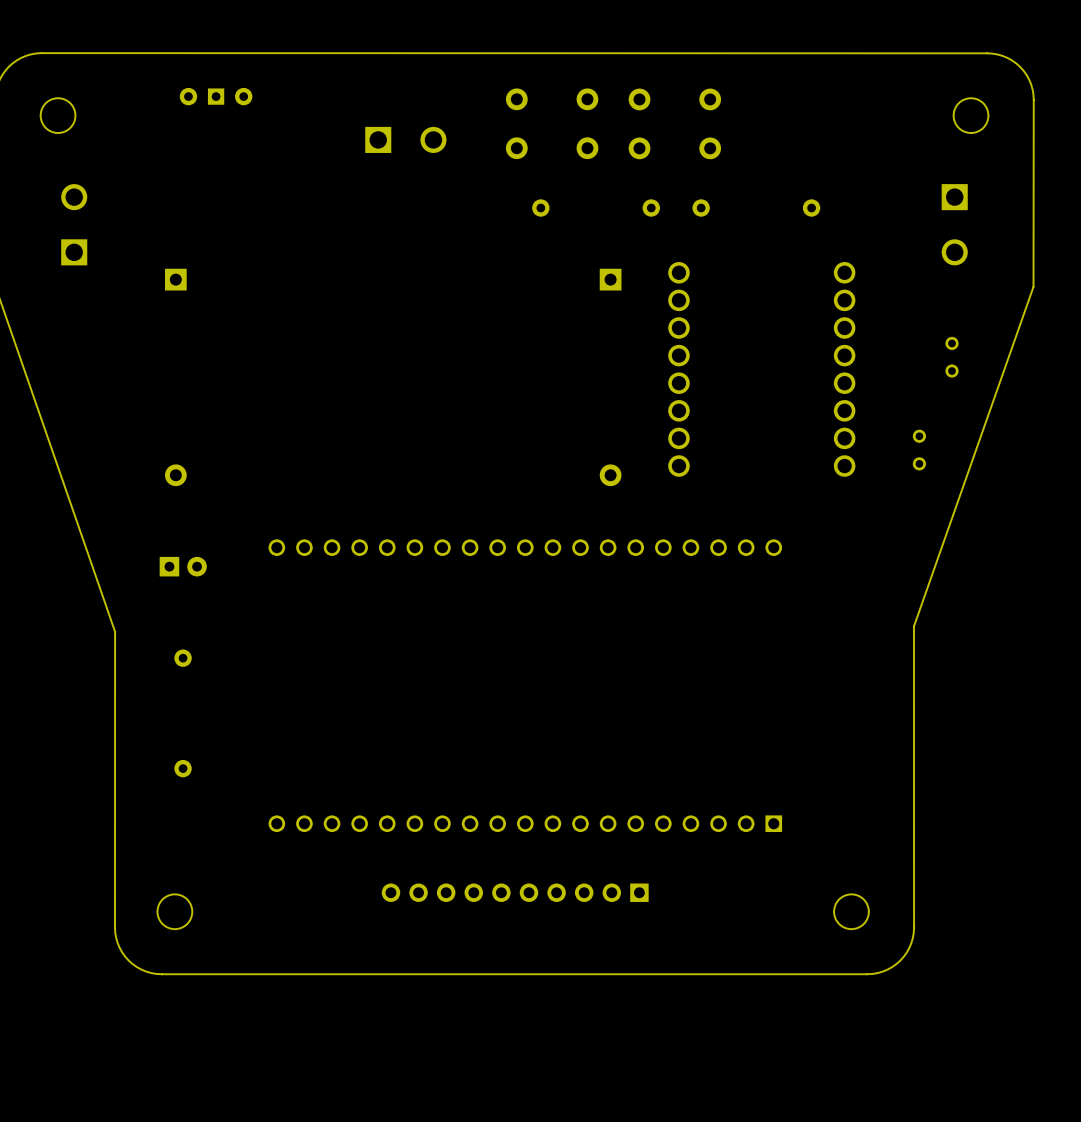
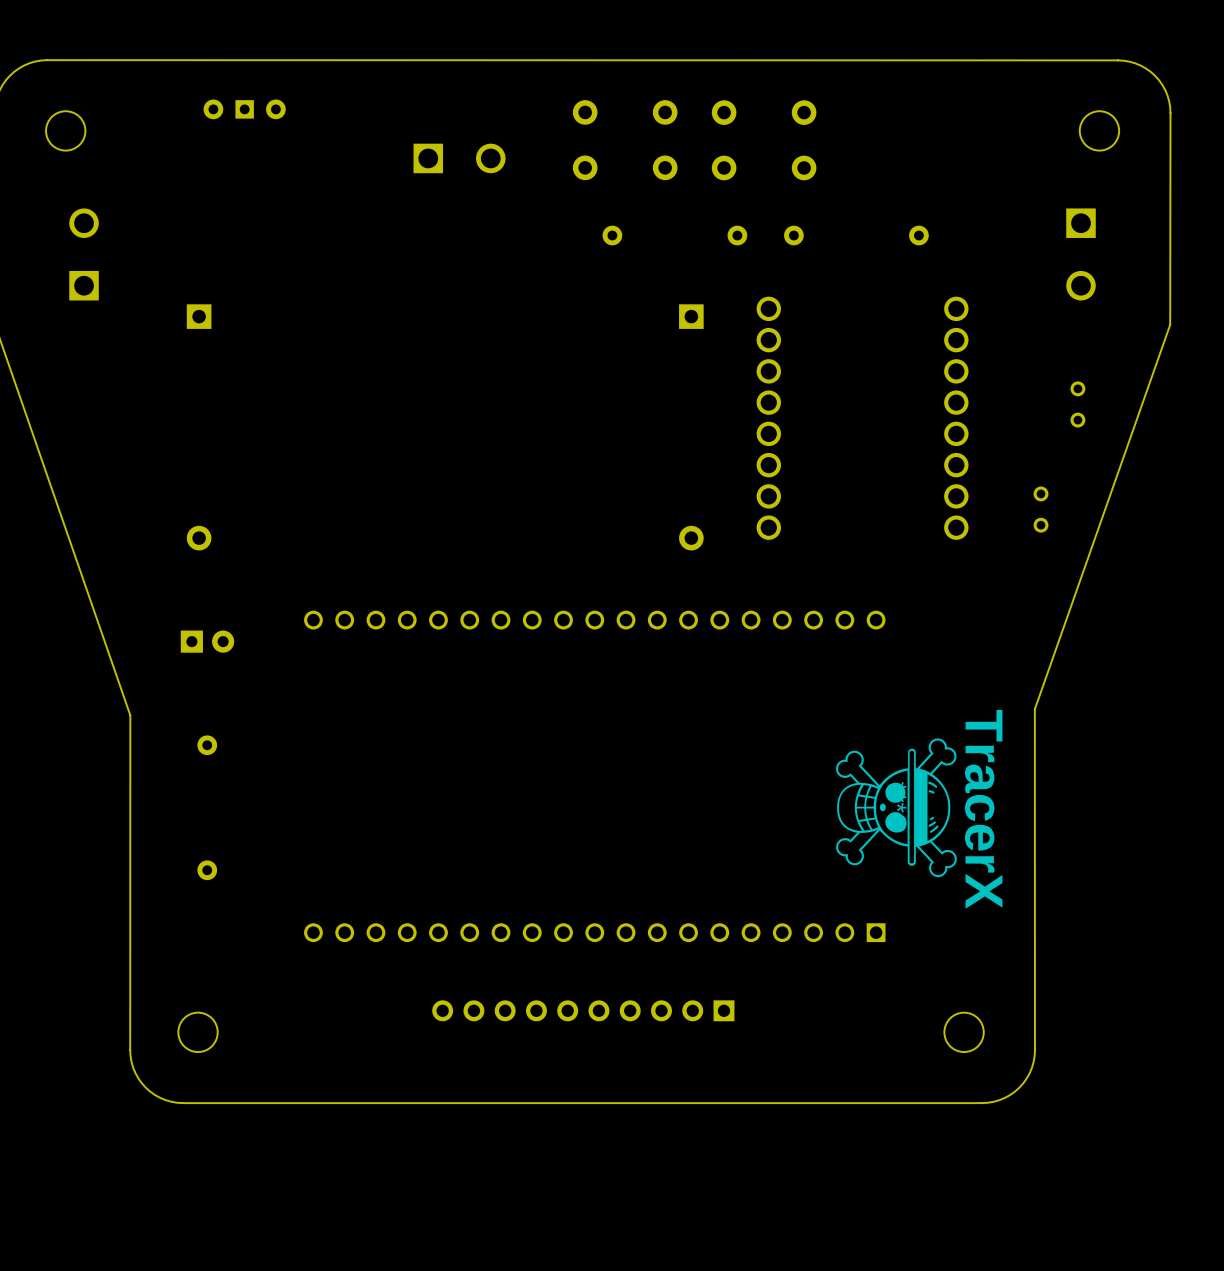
part: none -> (896, 807)
text: none -> TracerX (983, 809)

